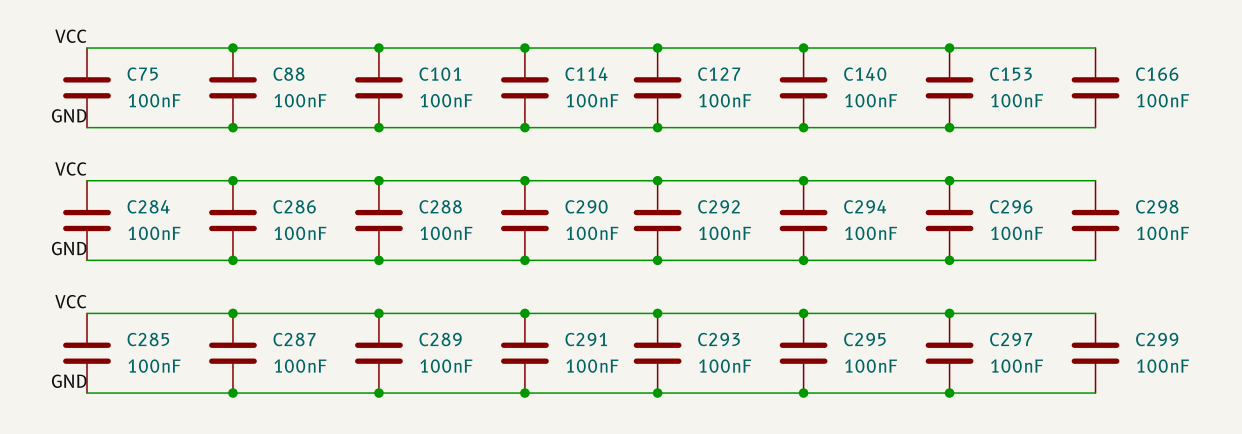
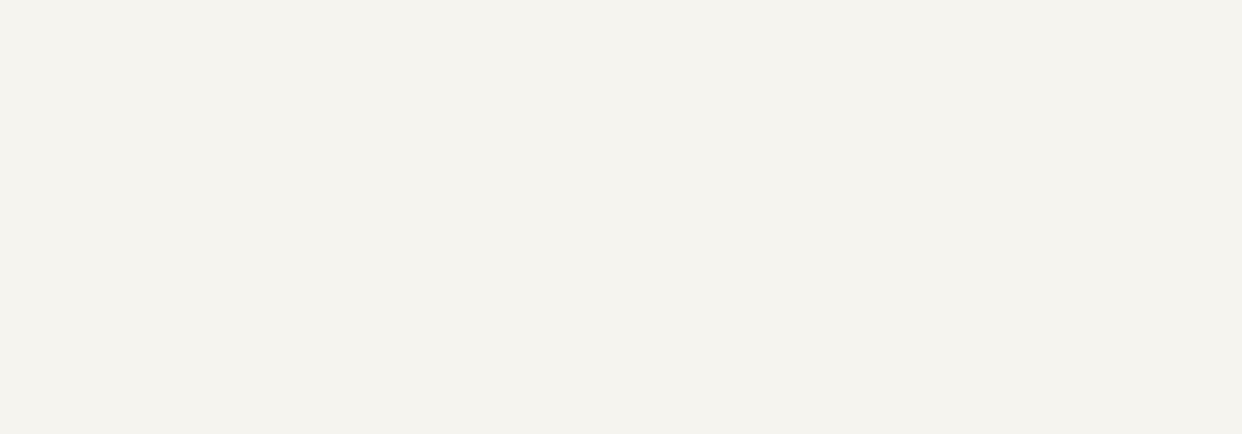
label: VCC (70, 36) -> none
wire: (87, 48) (1095, 48) -> none
junction: (232, 48) -> none
junction: (378, 48) -> none
junction: (524, 48) -> none
junction: (657, 48) -> none
junction: (803, 48) -> none
junction: (949, 48) -> none
C75: 100nF (87, 87) -> none
C88: 100nF (232, 87) -> none
C101: 100nF (378, 87) -> none
C114: 100nF (524, 87) -> none
C127: 100nF (657, 87) -> none
C140: 100nF (803, 87) -> none
C153: 100nF (949, 87) -> none
C166: 100nF (1095, 87) -> none
label: GND (69, 115) -> none
wire: (87, 127) (1095, 127) -> none
junction: (232, 127) -> none
junction: (378, 127) -> none
junction: (524, 127) -> none
junction: (657, 127) -> none
junction: (803, 127) -> none
junction: (949, 127) -> none
label: VCC (70, 168) -> none
wire: (87, 180) (1095, 180) -> none
junction: (232, 180) -> none
junction: (378, 180) -> none
junction: (524, 180) -> none
junction: (657, 180) -> none
junction: (803, 180) -> none
junction: (949, 180) -> none
C284: 100nF (87, 220) -> none
C286: 100nF (232, 220) -> none
C288: 100nF (378, 220) -> none
C290: 100nF (524, 220) -> none
C292: 100nF (657, 220) -> none
C294: 100nF (803, 220) -> none
C296: 100nF (949, 220) -> none
C298: 100nF (1095, 220) -> none
label: GND (69, 248) -> none
wire: (87, 260) (1095, 260) -> none
junction: (232, 260) -> none
junction: (378, 260) -> none
junction: (524, 260) -> none
junction: (657, 260) -> none
junction: (803, 260) -> none
junction: (949, 260) -> none
label: VCC (70, 301) -> none
wire: (87, 313) (1095, 313) -> none
junction: (232, 313) -> none
junction: (378, 313) -> none
junction: (524, 313) -> none
junction: (657, 313) -> none
junction: (803, 313) -> none
junction: (949, 313) -> none
C285: 100nF (87, 353) -> none
C287: 100nF (232, 353) -> none
C289: 100nF (378, 353) -> none
C291: 100nF (524, 353) -> none
C293: 100nF (657, 353) -> none
C295: 100nF (803, 353) -> none
C297: 100nF (949, 353) -> none
C299: 100nF (1095, 353) -> none
label: GND (69, 381) -> none
wire: (87, 393) (1095, 393) -> none
junction: (232, 393) -> none
junction: (378, 393) -> none
junction: (524, 393) -> none
junction: (657, 393) -> none
junction: (803, 393) -> none
junction: (949, 393) -> none

